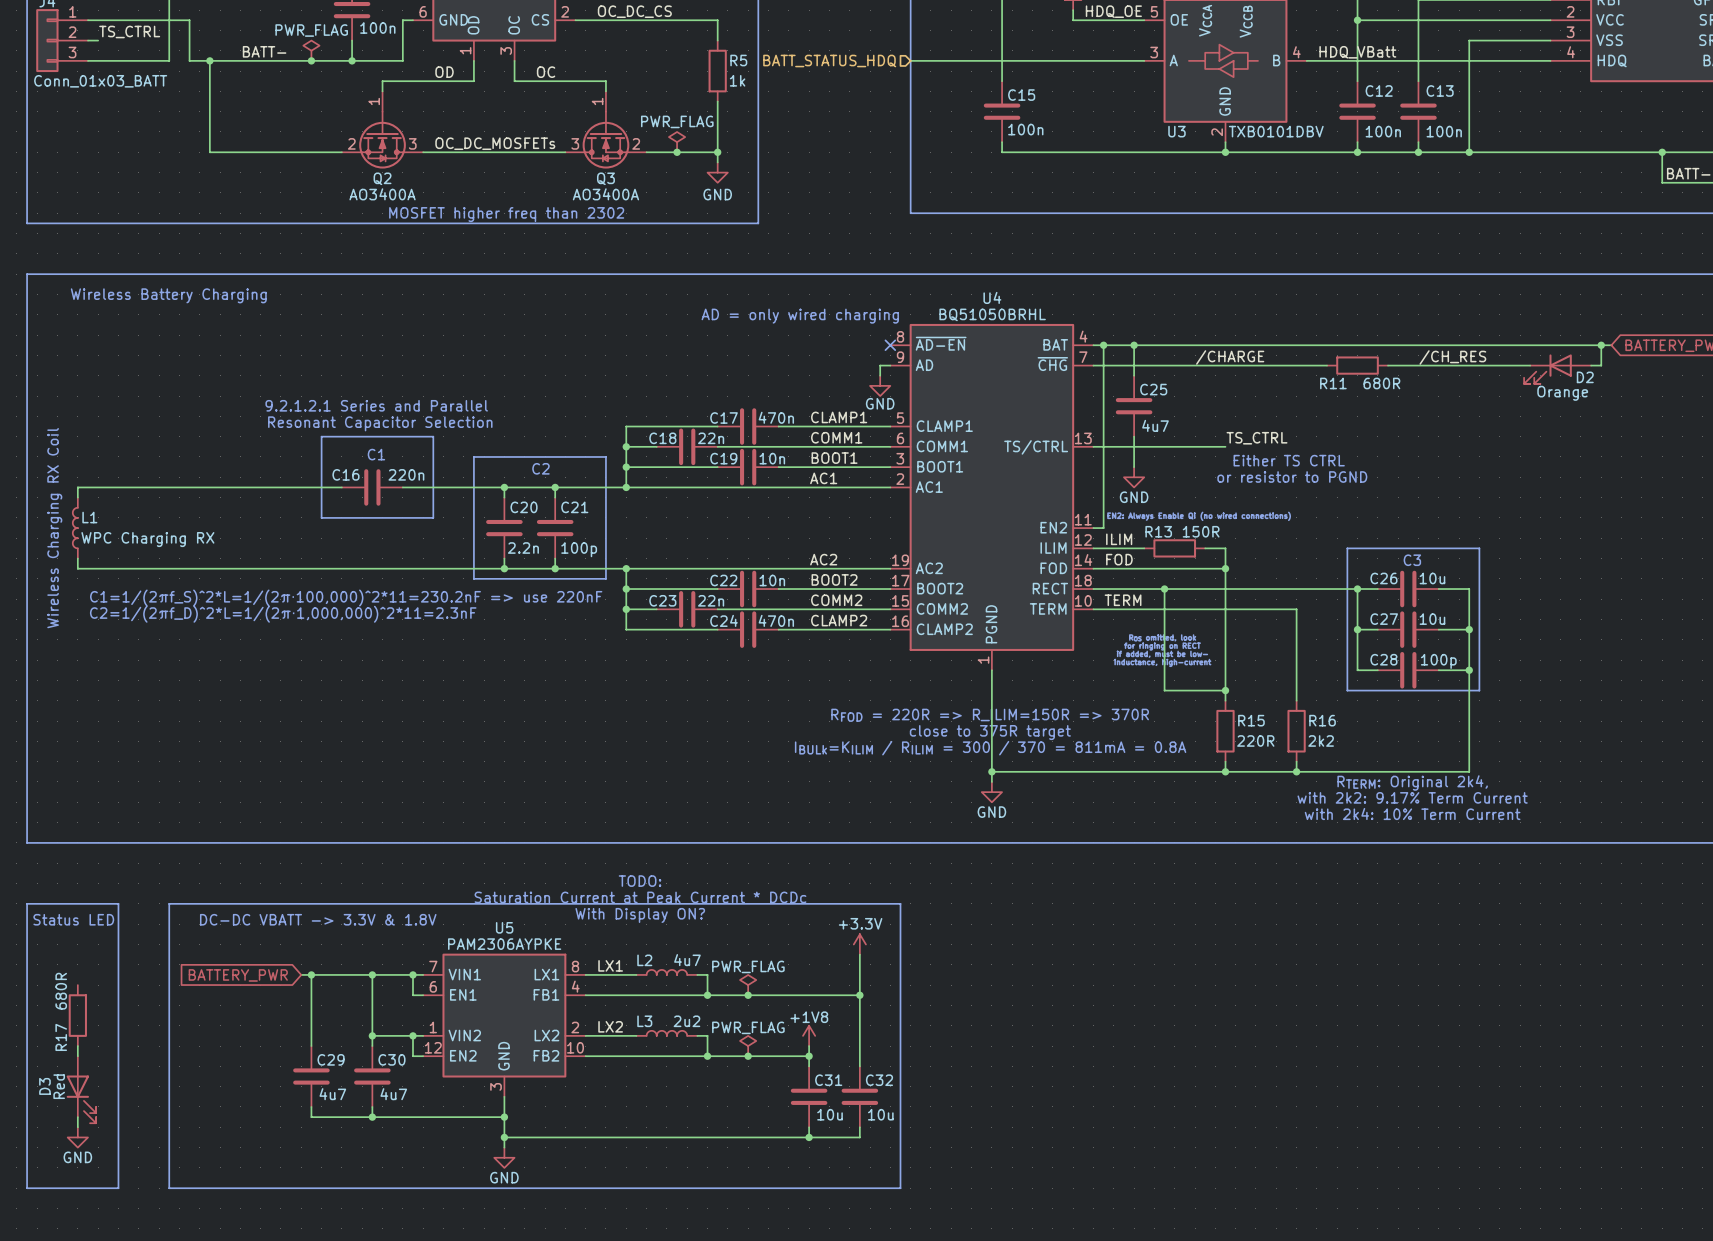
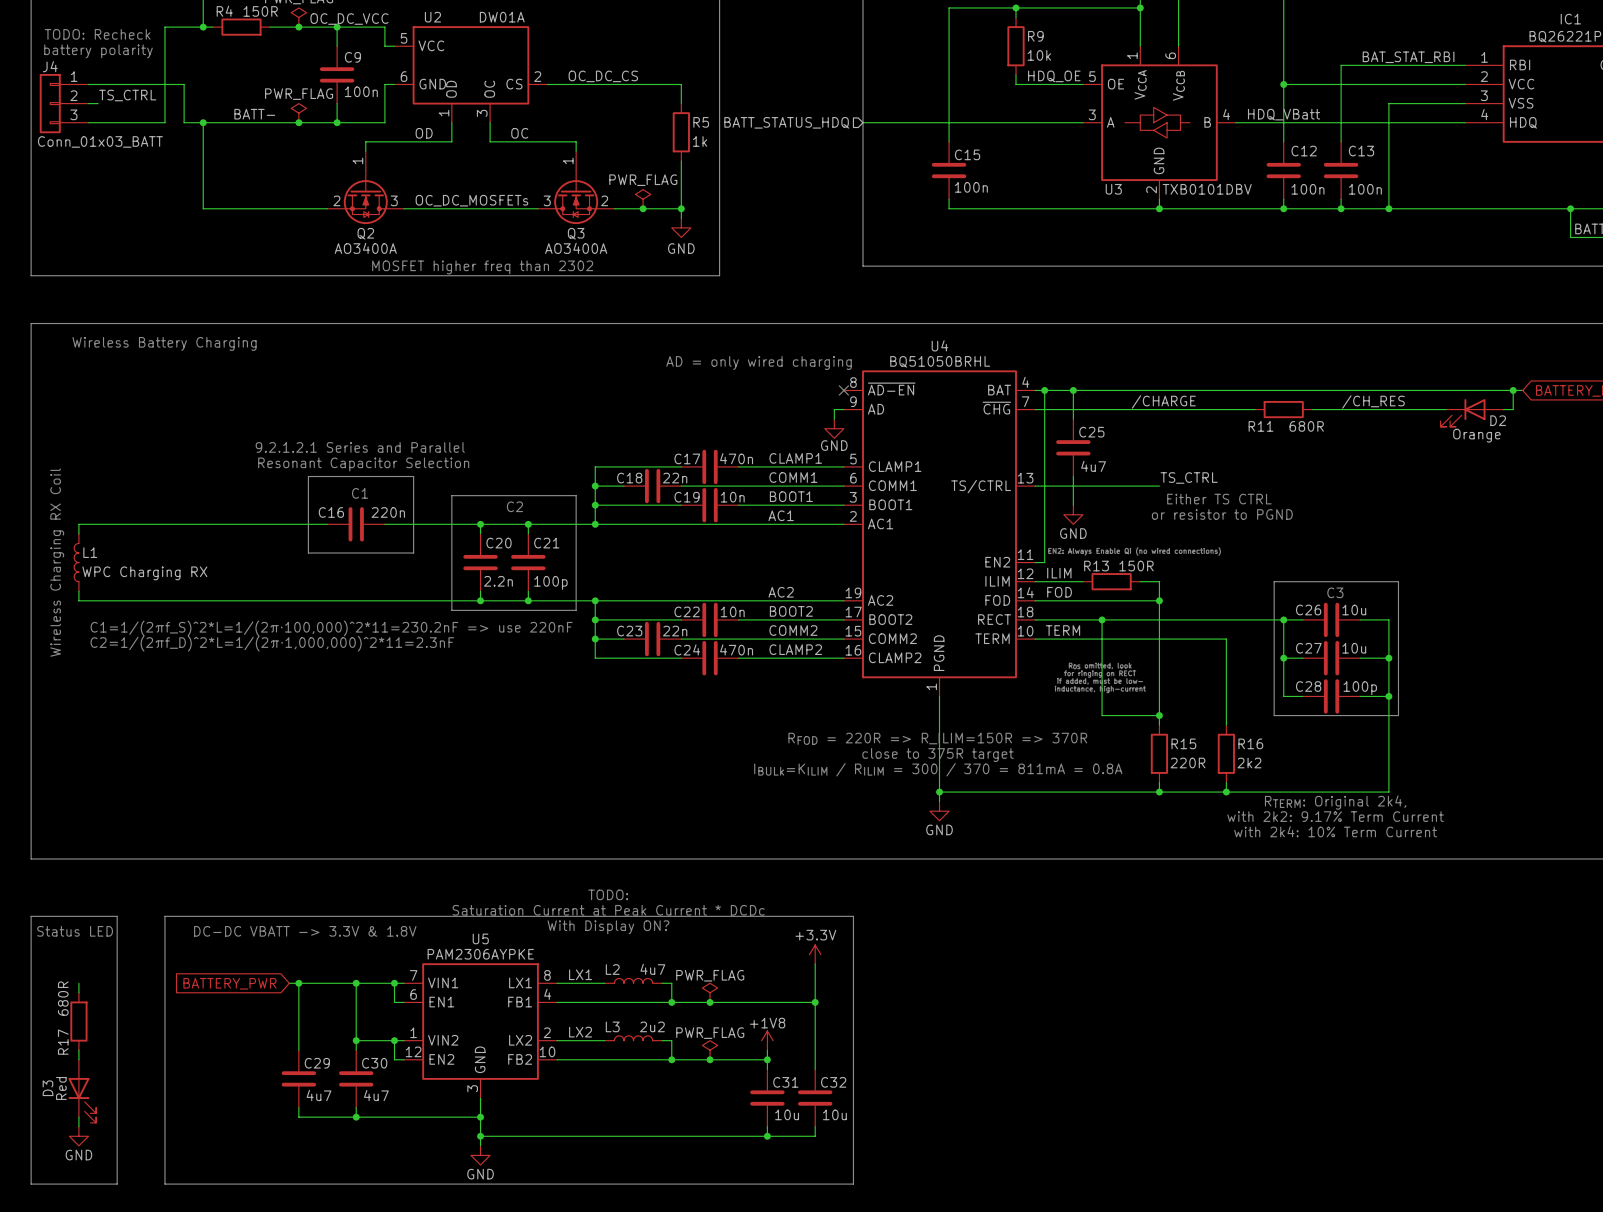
wire: none -> (78, 983) (78, 992)

